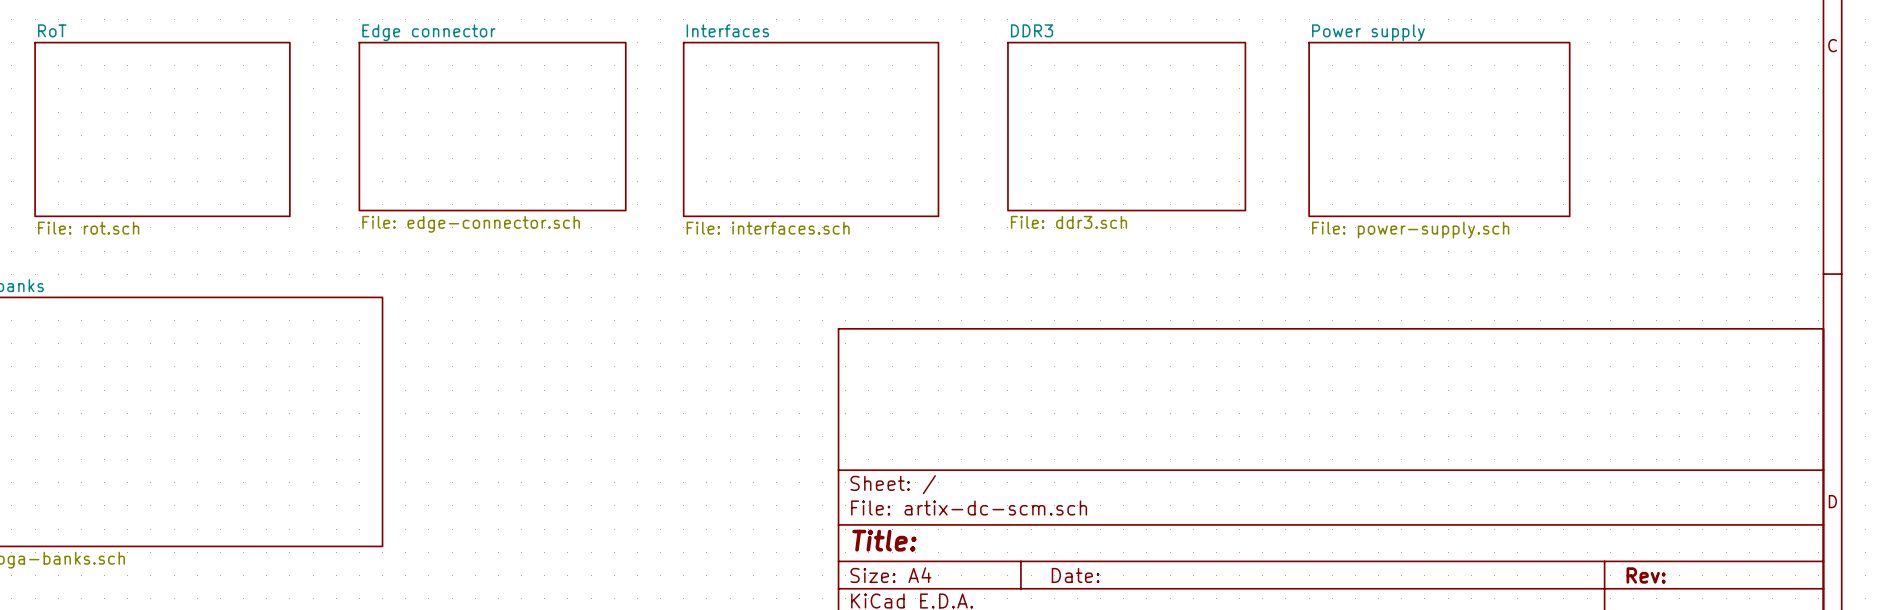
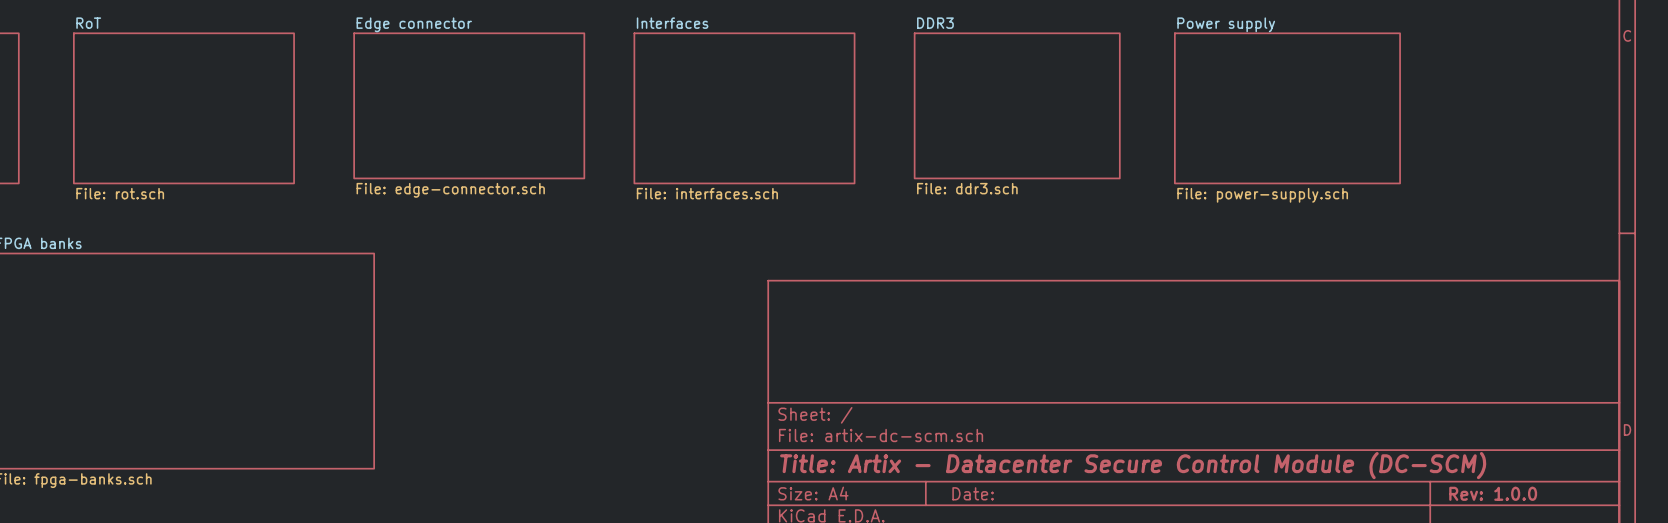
title block: Title: (884, 540) -> Title: Artix - Datacenter Secure Control Module (DC-SCM) (1133, 465)
title block: Rev: (1646, 575) -> Rev: 1.0.0 (1493, 493)

